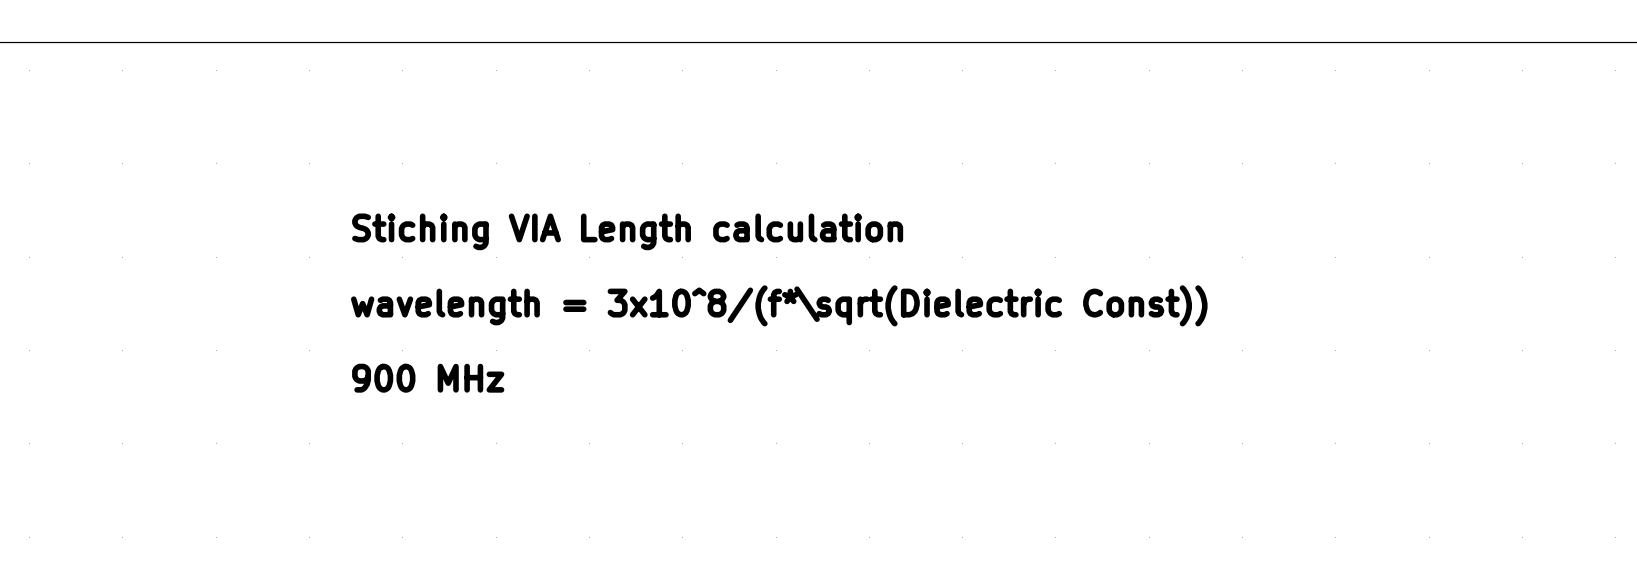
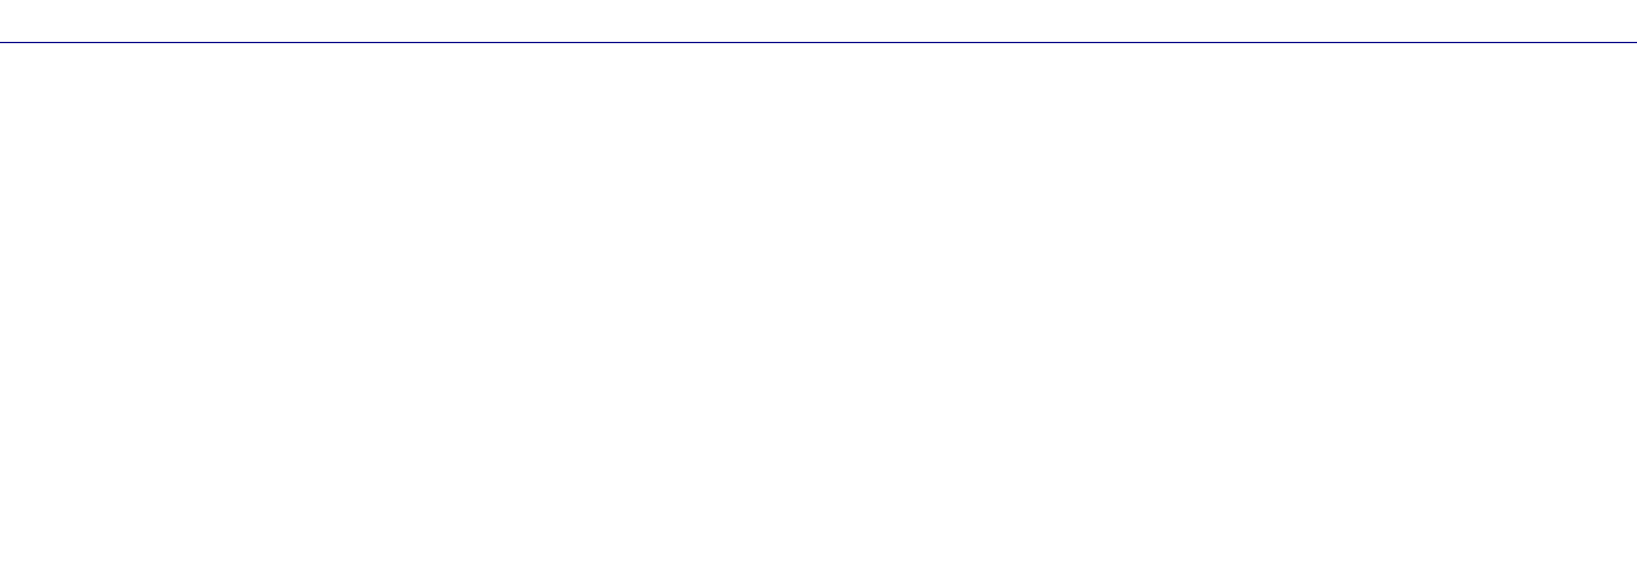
text: Stiching VIA Length calculation (627, 231) -> none
text: wavelength = 3x10^8/(f*\sqrt(Dielectric Const)) (779, 305) -> none
text: 900 MHz (428, 378) -> none

